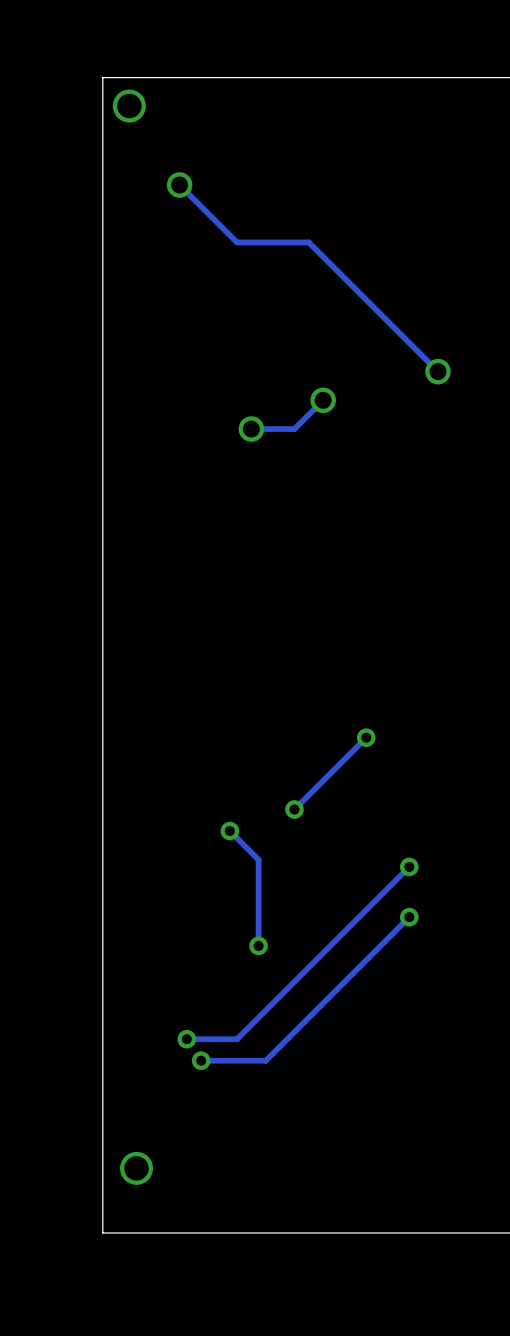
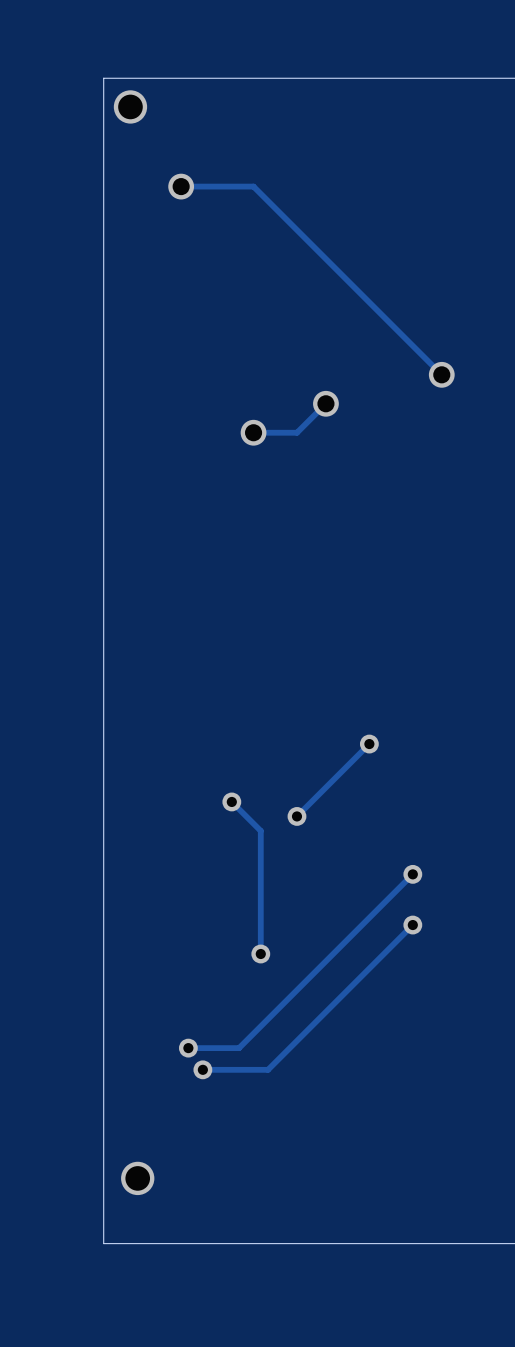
track: (179, 185) (237, 242) (308, 242) -> (181, 186) (253, 186) (311, 244)
track: (229, 831) (258, 859) -> (231, 801) (260, 830) (260, 867)
via position: (229, 831) -> (231, 801)

